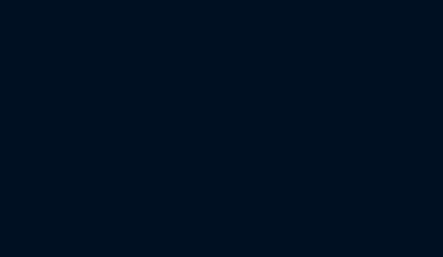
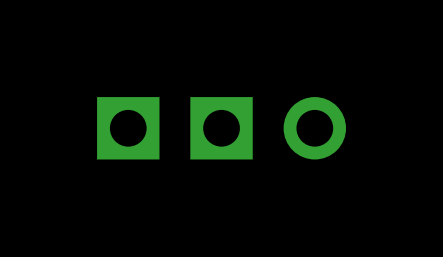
part: none -> (221, 128)

